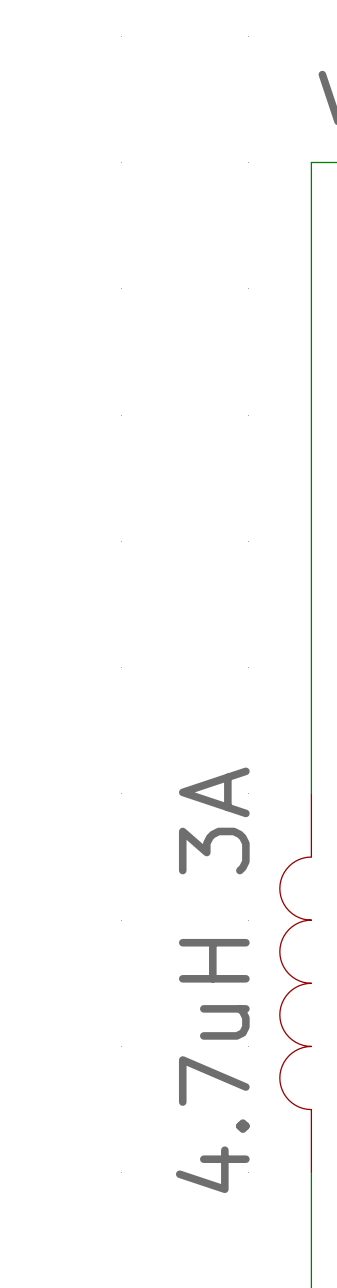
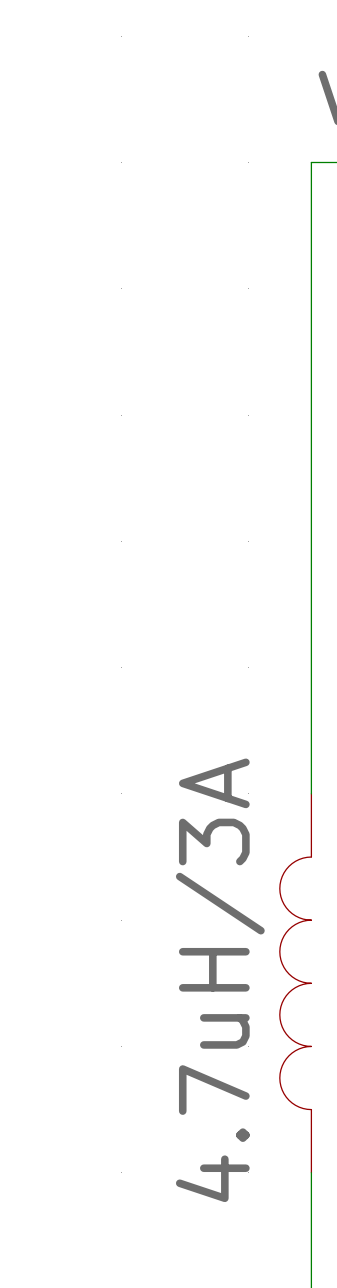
part value: 4.7uH 3A (212, 980) -> 4.7uH/3A (220, 980)

